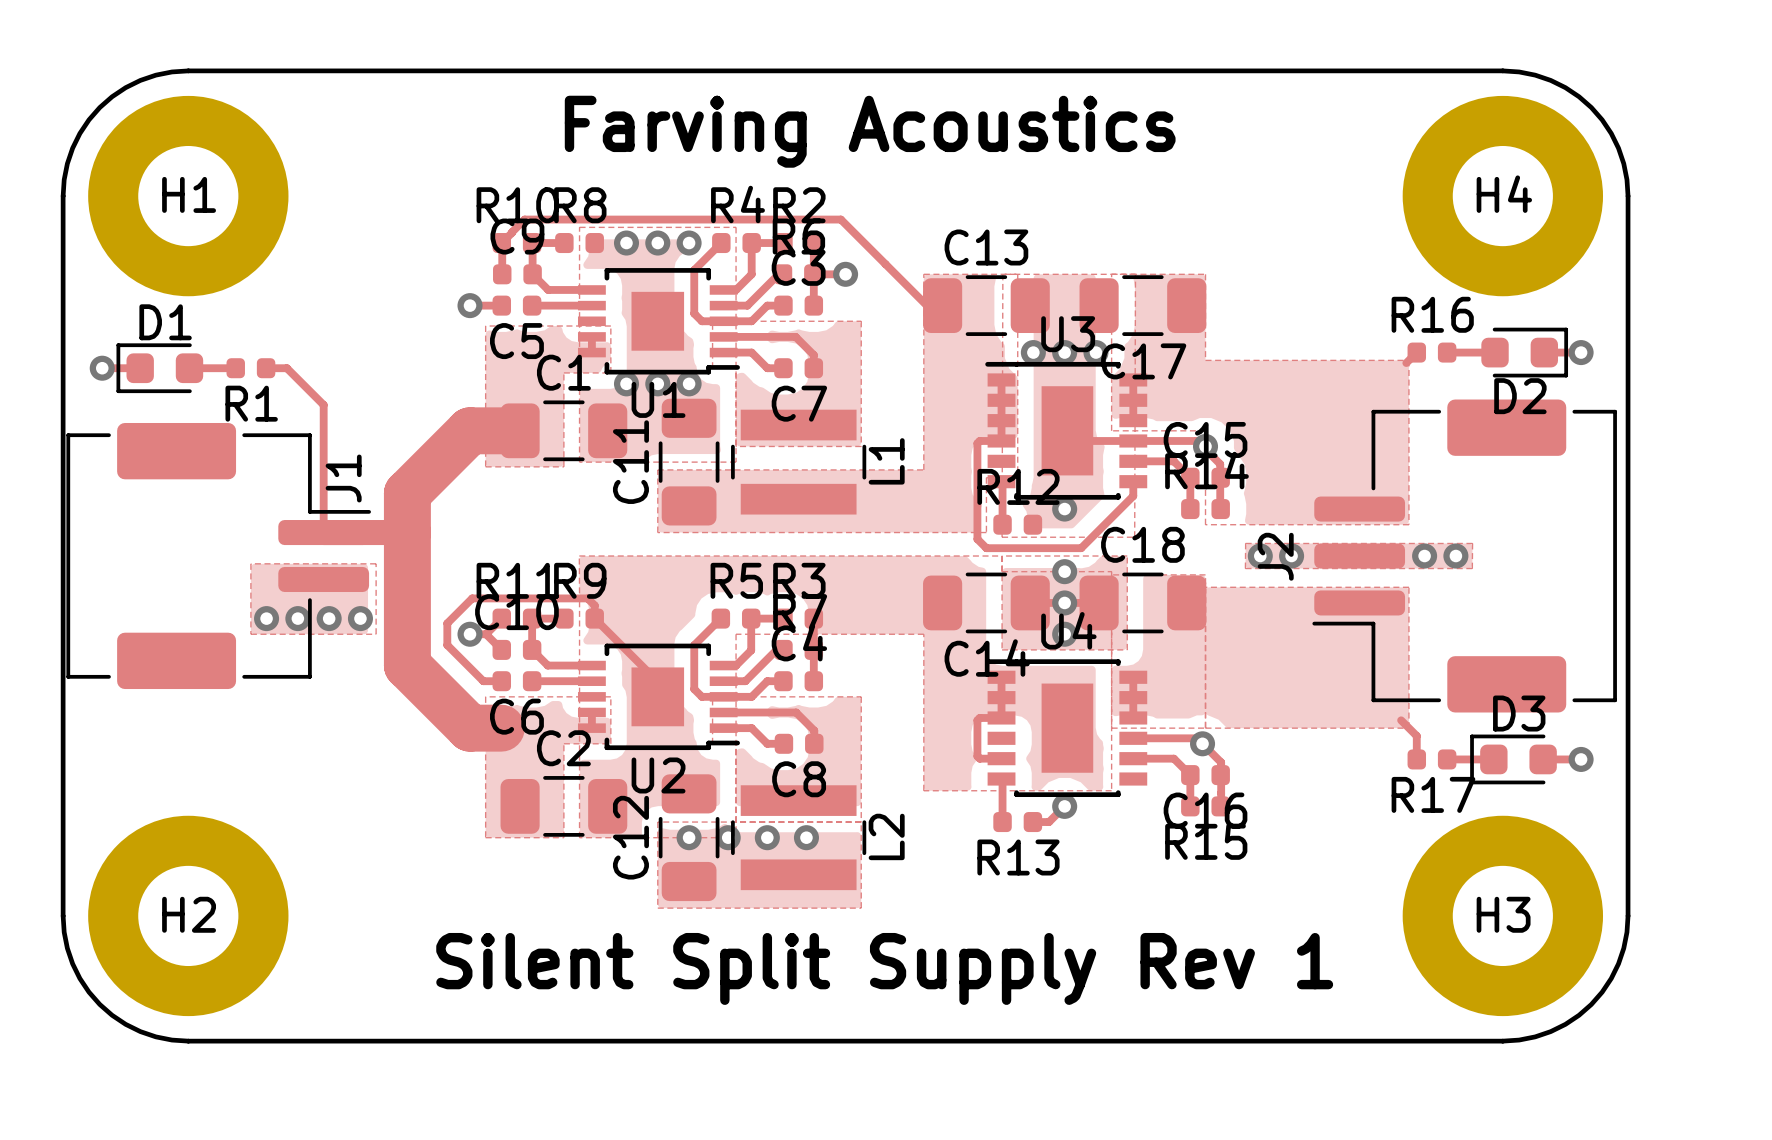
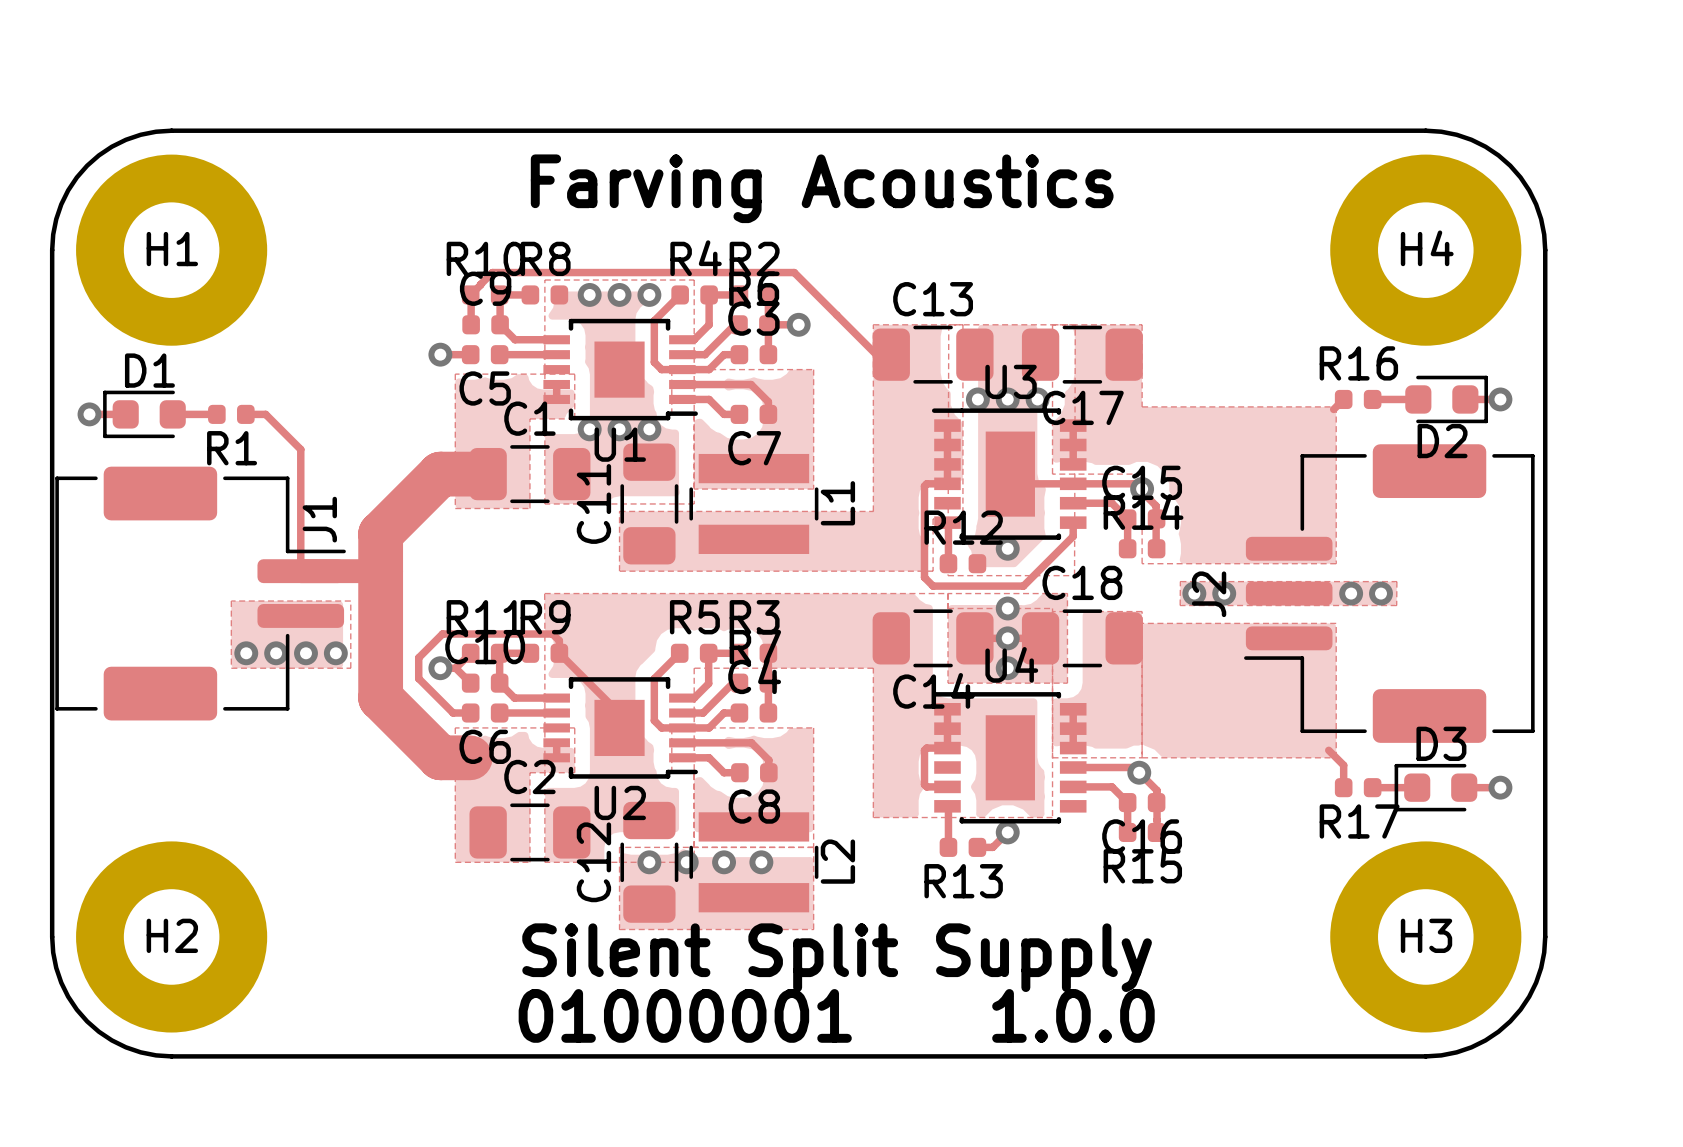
text: Silent Split Supply Rev 1 (884, 968) -> Silent Split Supply (837, 957)
text: none -> 01000001 (685, 1015)
text: none -> 1.0.0 (1073, 1015)

